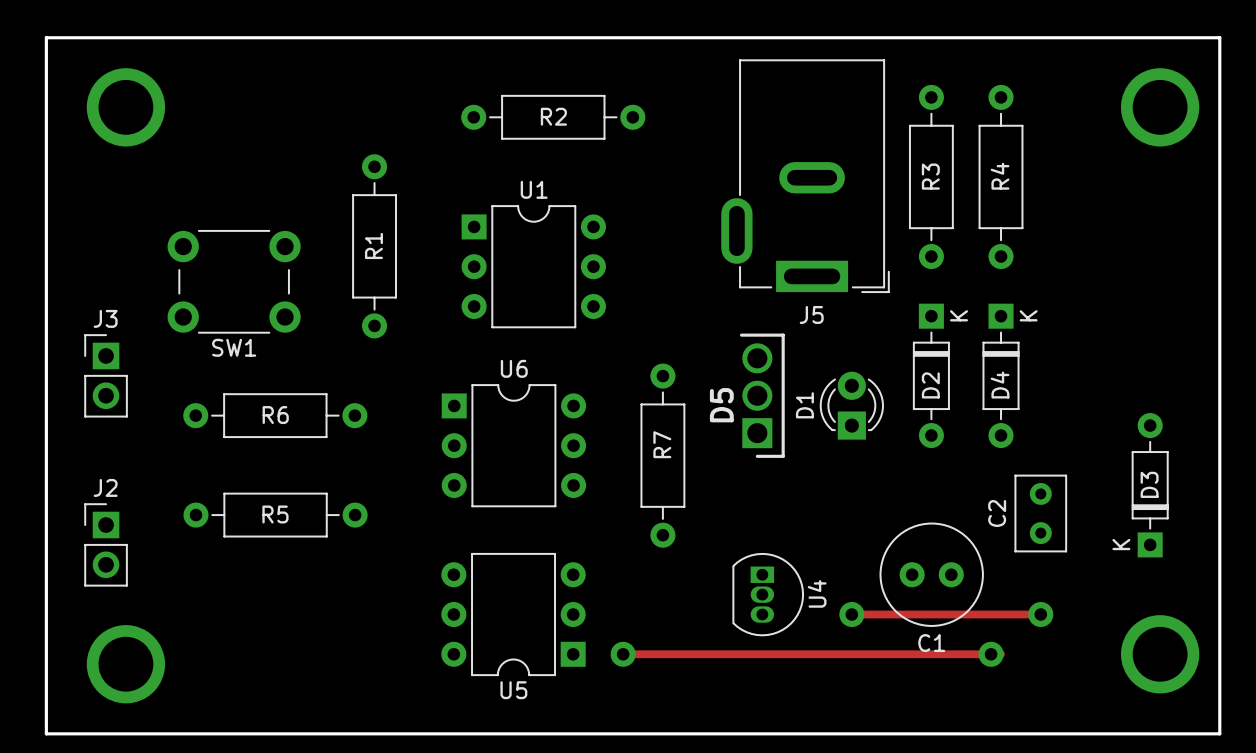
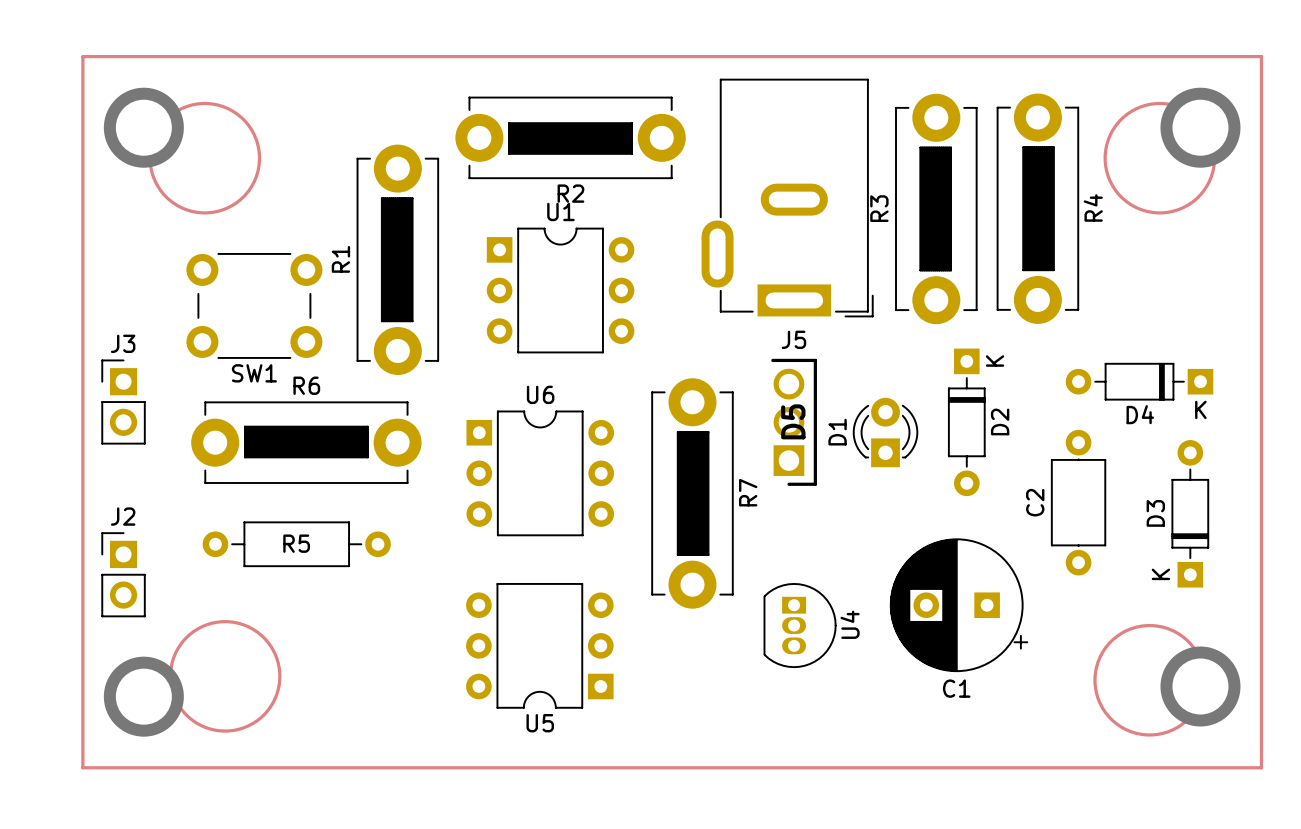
board edge: (46, 37) (1219, 37) (1219, 733) (46, 733) (46, 37) -> none
track: none -> (82, 56) (1261, 56) (1261, 767) (82, 767) (82, 56)
drawing: none -> [148, 101, 262, 215]
drawing: none -> [1103, 101, 1217, 215]
R3 footprint: [909, 84, 954, 270] -> [895, 93, 978, 325]
R4 footprint: [978, 84, 1024, 270] -> [996, 93, 1080, 324]
R2 footprint: [461, 94, 646, 140] -> [455, 96, 686, 180]
R2 name position: R2 (553, 116) -> R2 (570, 193)
R1 footprint: [352, 154, 397, 339] -> [356, 144, 440, 375]
J5 position: (805, 176) -> (787, 198)
R3 name position: R3 (930, 176) -> R3 (879, 208)
R4 name position: R4 (1000, 176) -> R4 (1093, 207)
R1 name position: R1 (373, 245) -> R1 (340, 259)
R7 footprint: [640, 363, 686, 548] -> [651, 378, 734, 609]
D2 position: (931, 375) -> (966, 422)
D4 rotation: 0° (1001, 375) -> 90° clockwise (1139, 381)
D4 position: (1001, 375) -> (1139, 381)
D2 name position: D2 (930, 385) -> D2 (1000, 421)
R6 footprint: [183, 393, 368, 439] -> [191, 401, 422, 484]
D5 name position: D5 (721, 405) -> D5 (793, 421)
R6 name position: R6 (275, 415) -> R6 (306, 385)
R7 name position: R7 (662, 444) -> R7 (748, 492)
C2 footprint: [1014, 474, 1068, 553] -> [1050, 429, 1107, 576]
D3 name position: D3 (1149, 484) -> D3 (1155, 513)
C1 footprint: [879, 522, 984, 627] -> [889, 538, 1029, 673]
drawing: none -> [168, 620, 282, 733]
drawing: none -> [1093, 623, 1206, 737]
track: (851, 614) (1040, 614) -> none
via: (851, 614) -> none
via: (1040, 614) -> none
track: (623, 654) (1001, 654) -> none
via: (623, 654) -> none
via: (991, 654) -> none

